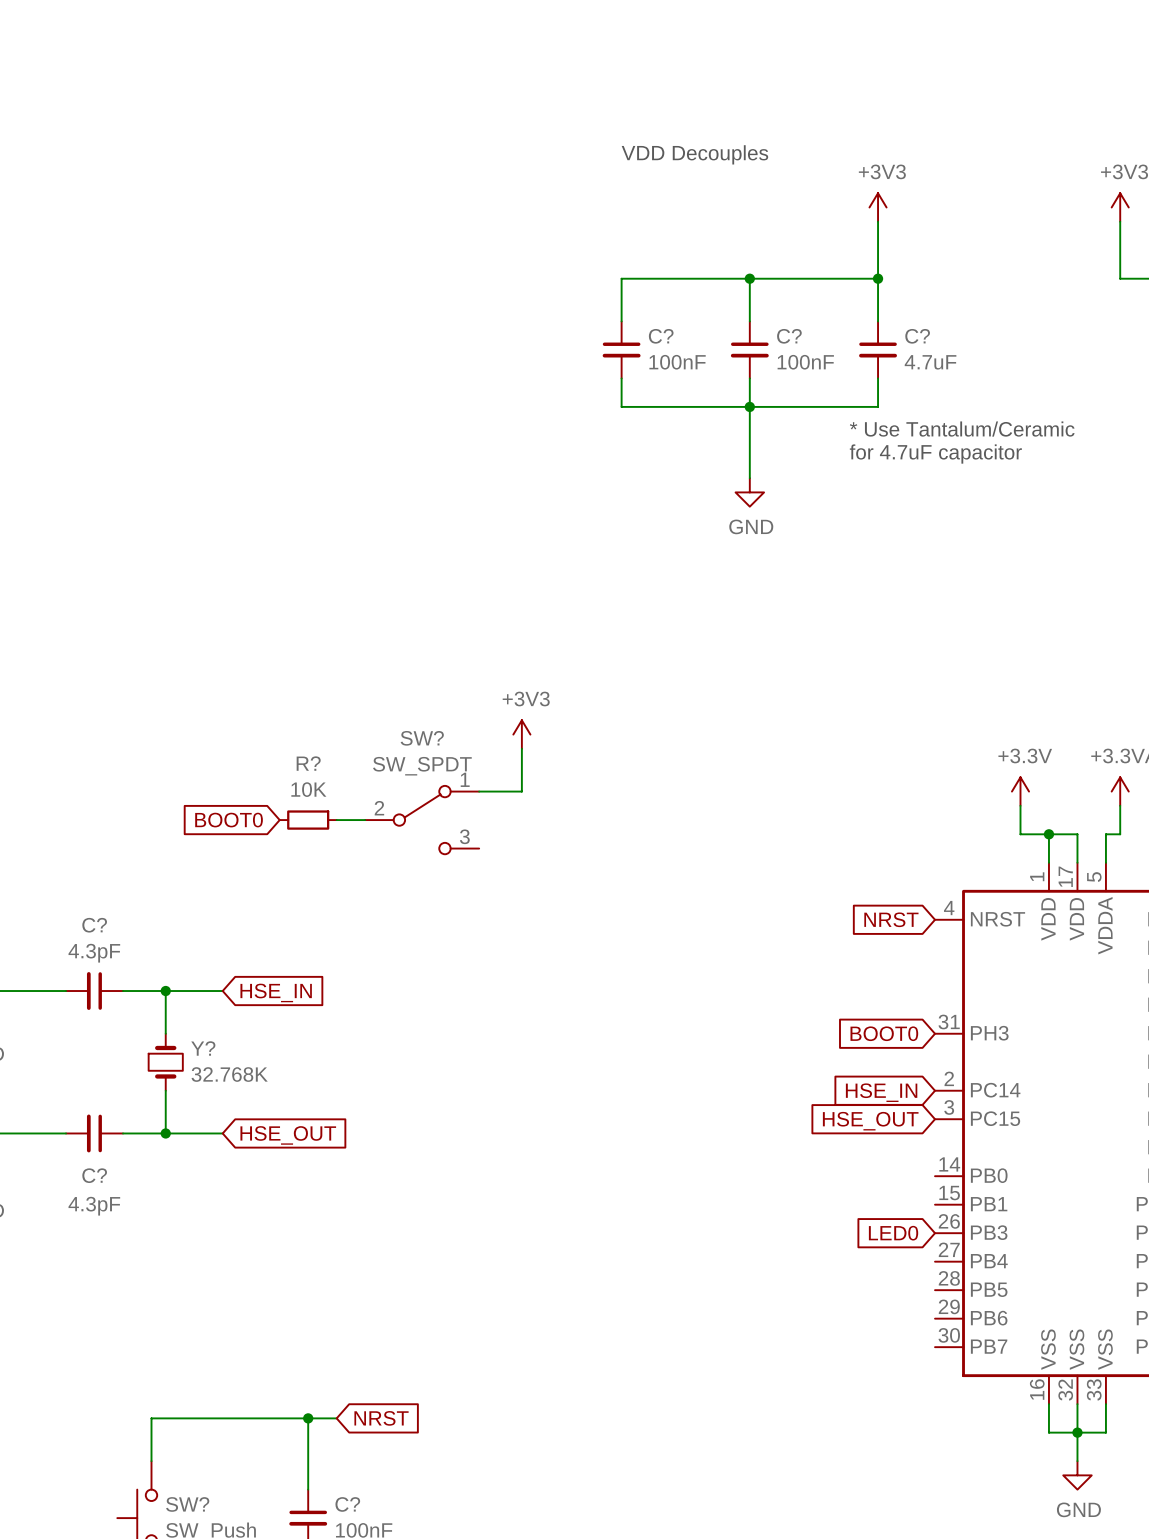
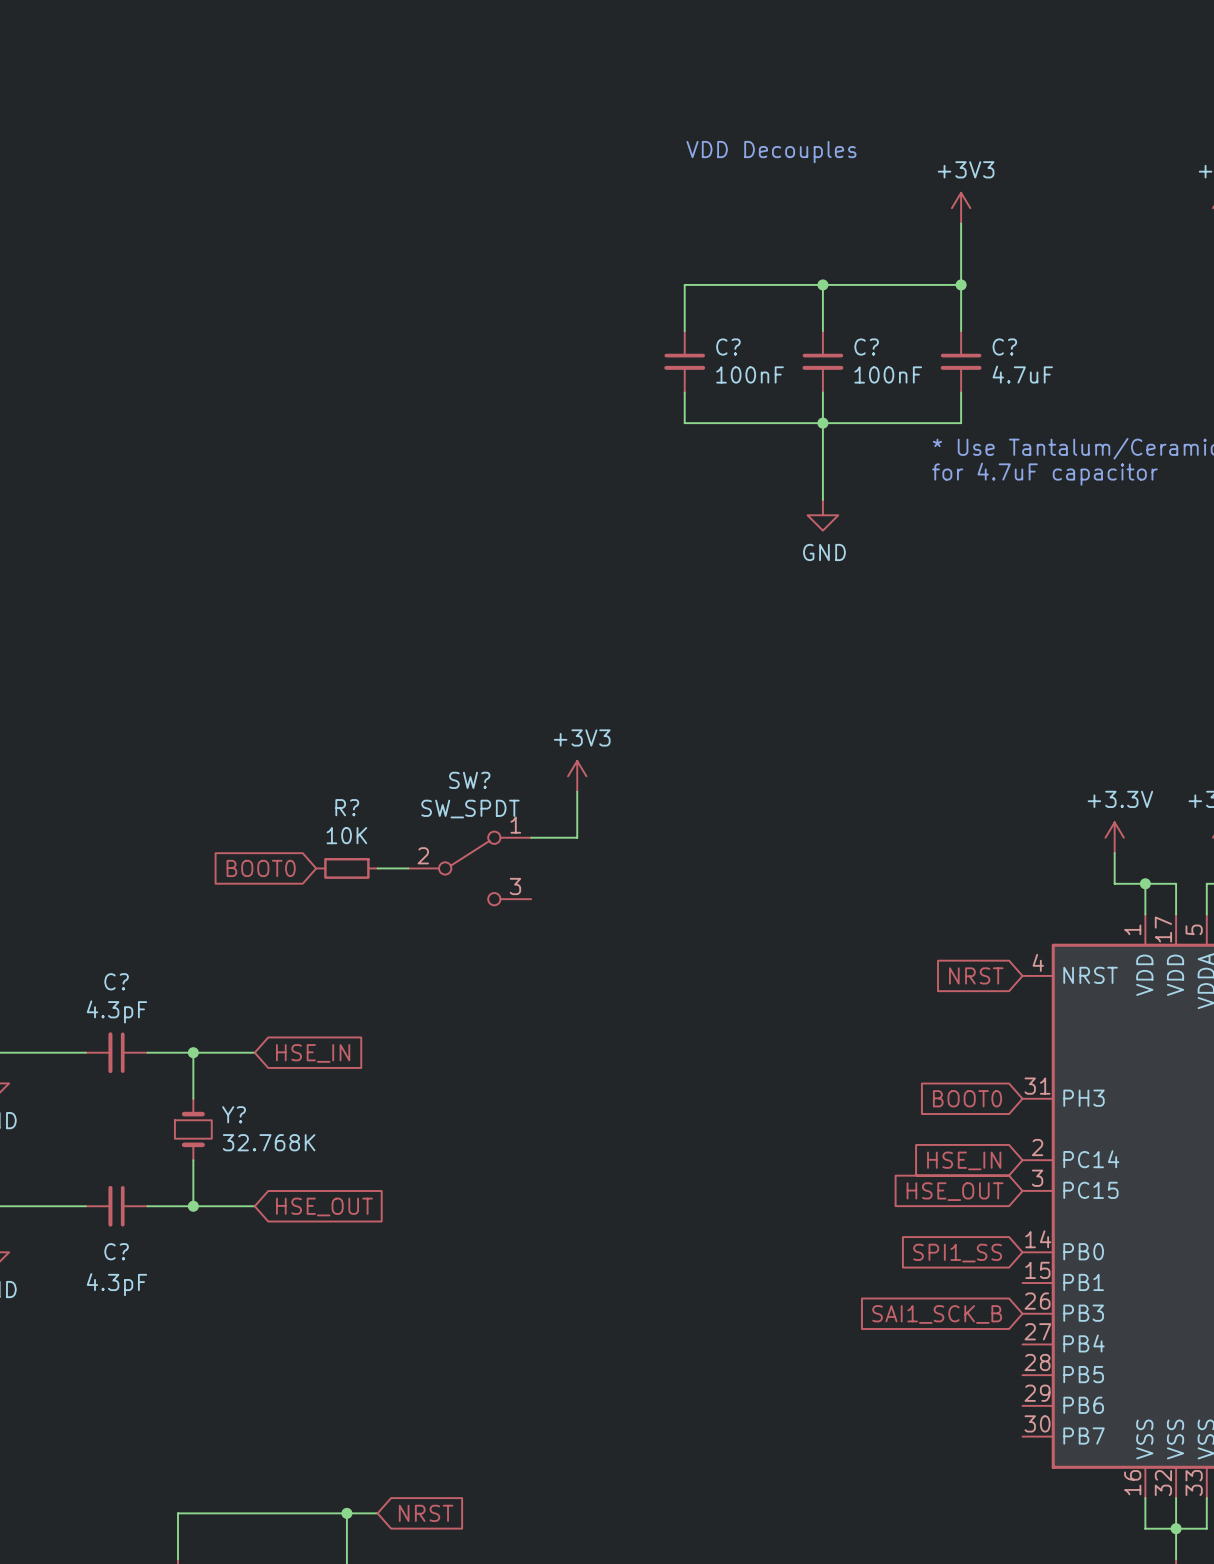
global label: none -> SPI1_SS (957, 1253)
global label: LED0 (893, 1233) -> SAI1_SCK_B (937, 1314)

